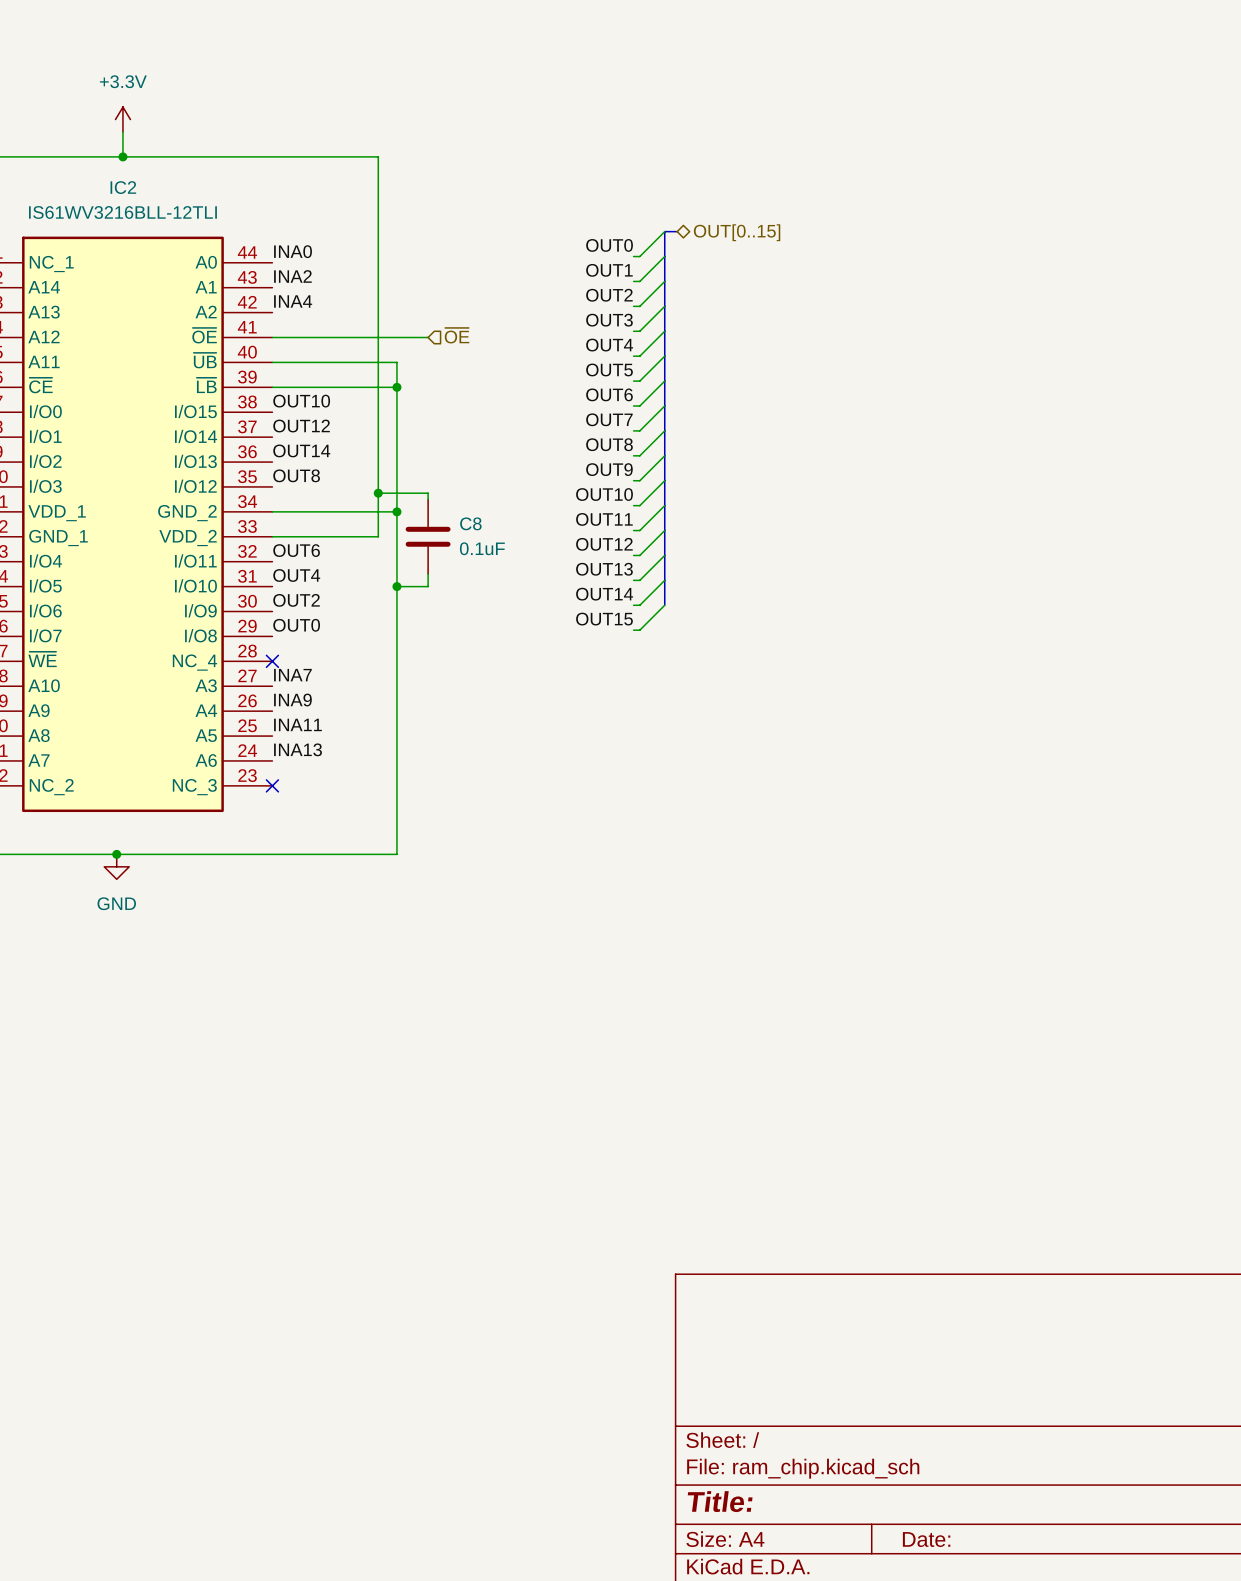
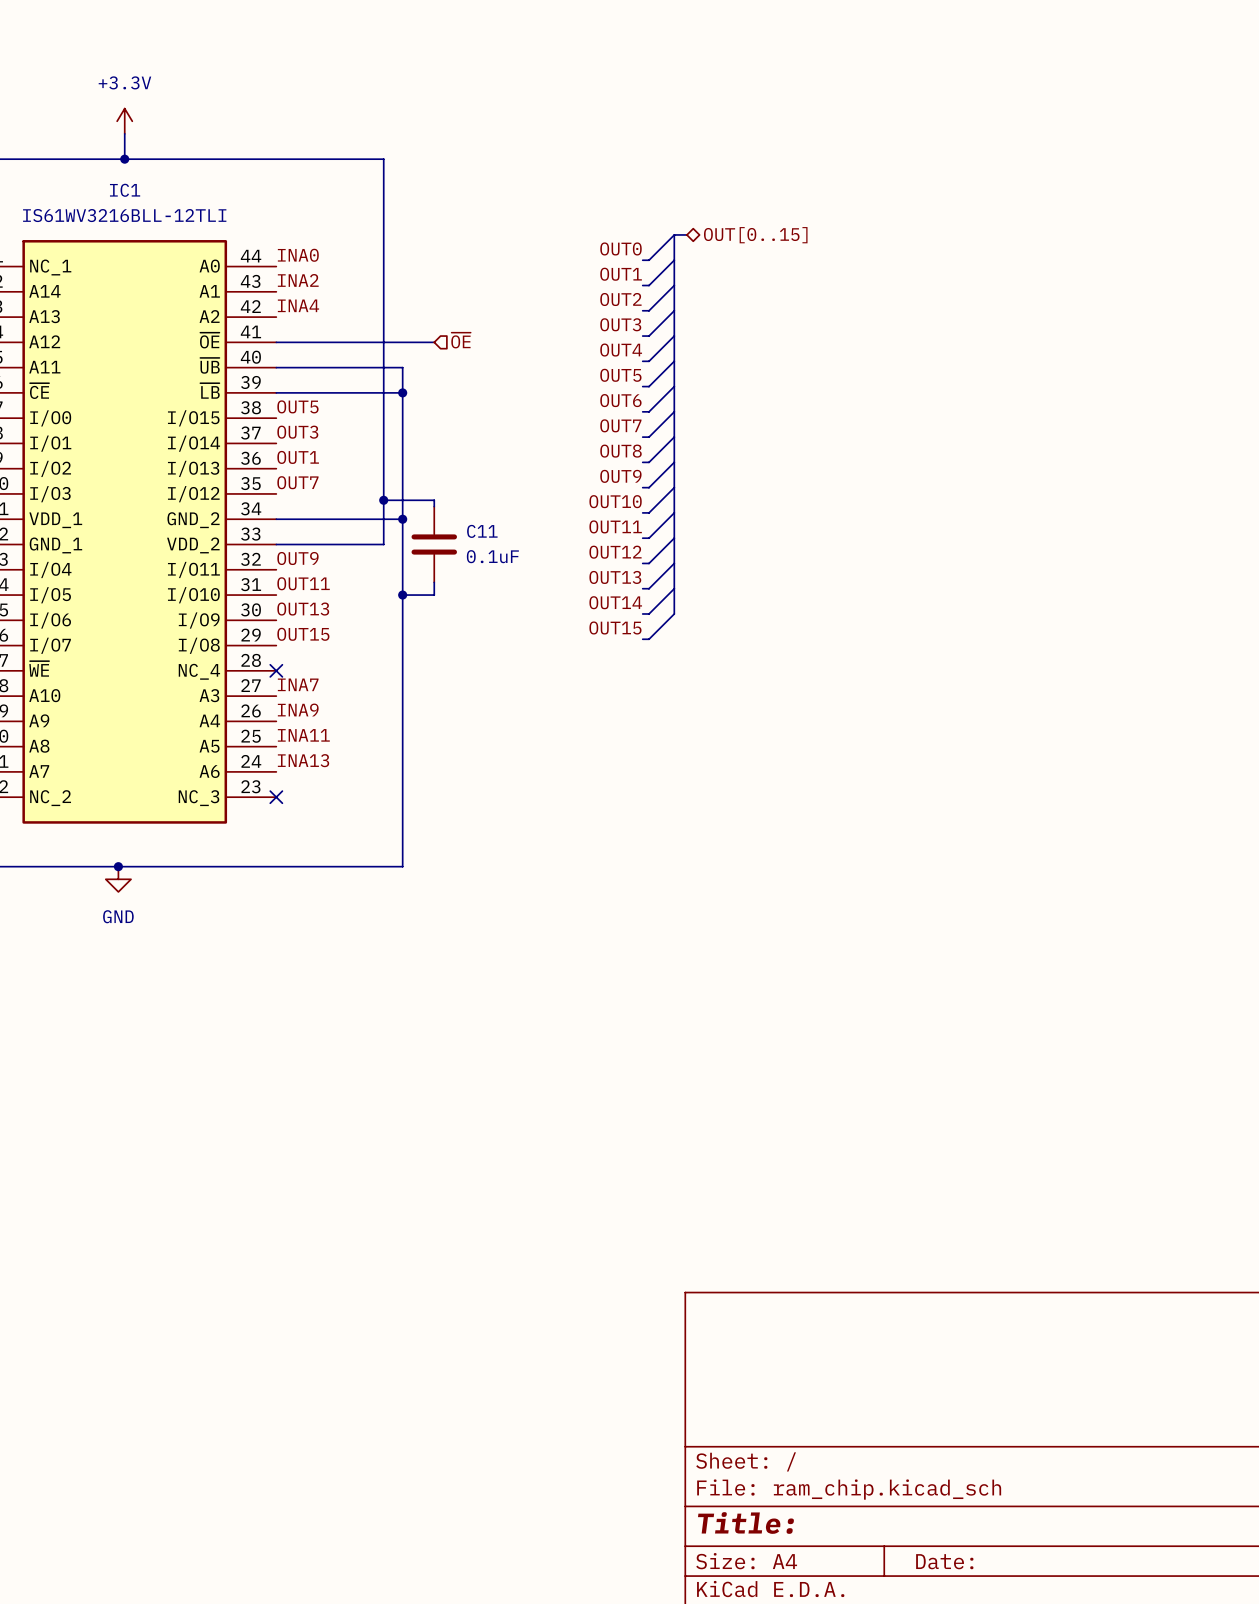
IC2 name: IC2 (123, 187) -> IC1 (125, 190)
label: OUT10 (301, 401) -> OUT5 (297, 406)
label: OUT12 (301, 426) -> OUT3 (297, 432)
label: OUT14 (301, 450) -> OUT1 (298, 457)
label: OUT8 (296, 475) -> OUT7 (297, 482)
C8 name: C8 (470, 523) -> C11 (482, 531)
label: OUT6 (296, 550) -> OUT9 (297, 558)
label: OUT4 (296, 575) -> OUT11 (303, 583)
label: OUT2 (296, 600) -> OUT13 (303, 609)
label: OUT0 (296, 625) -> OUT15 (303, 634)

